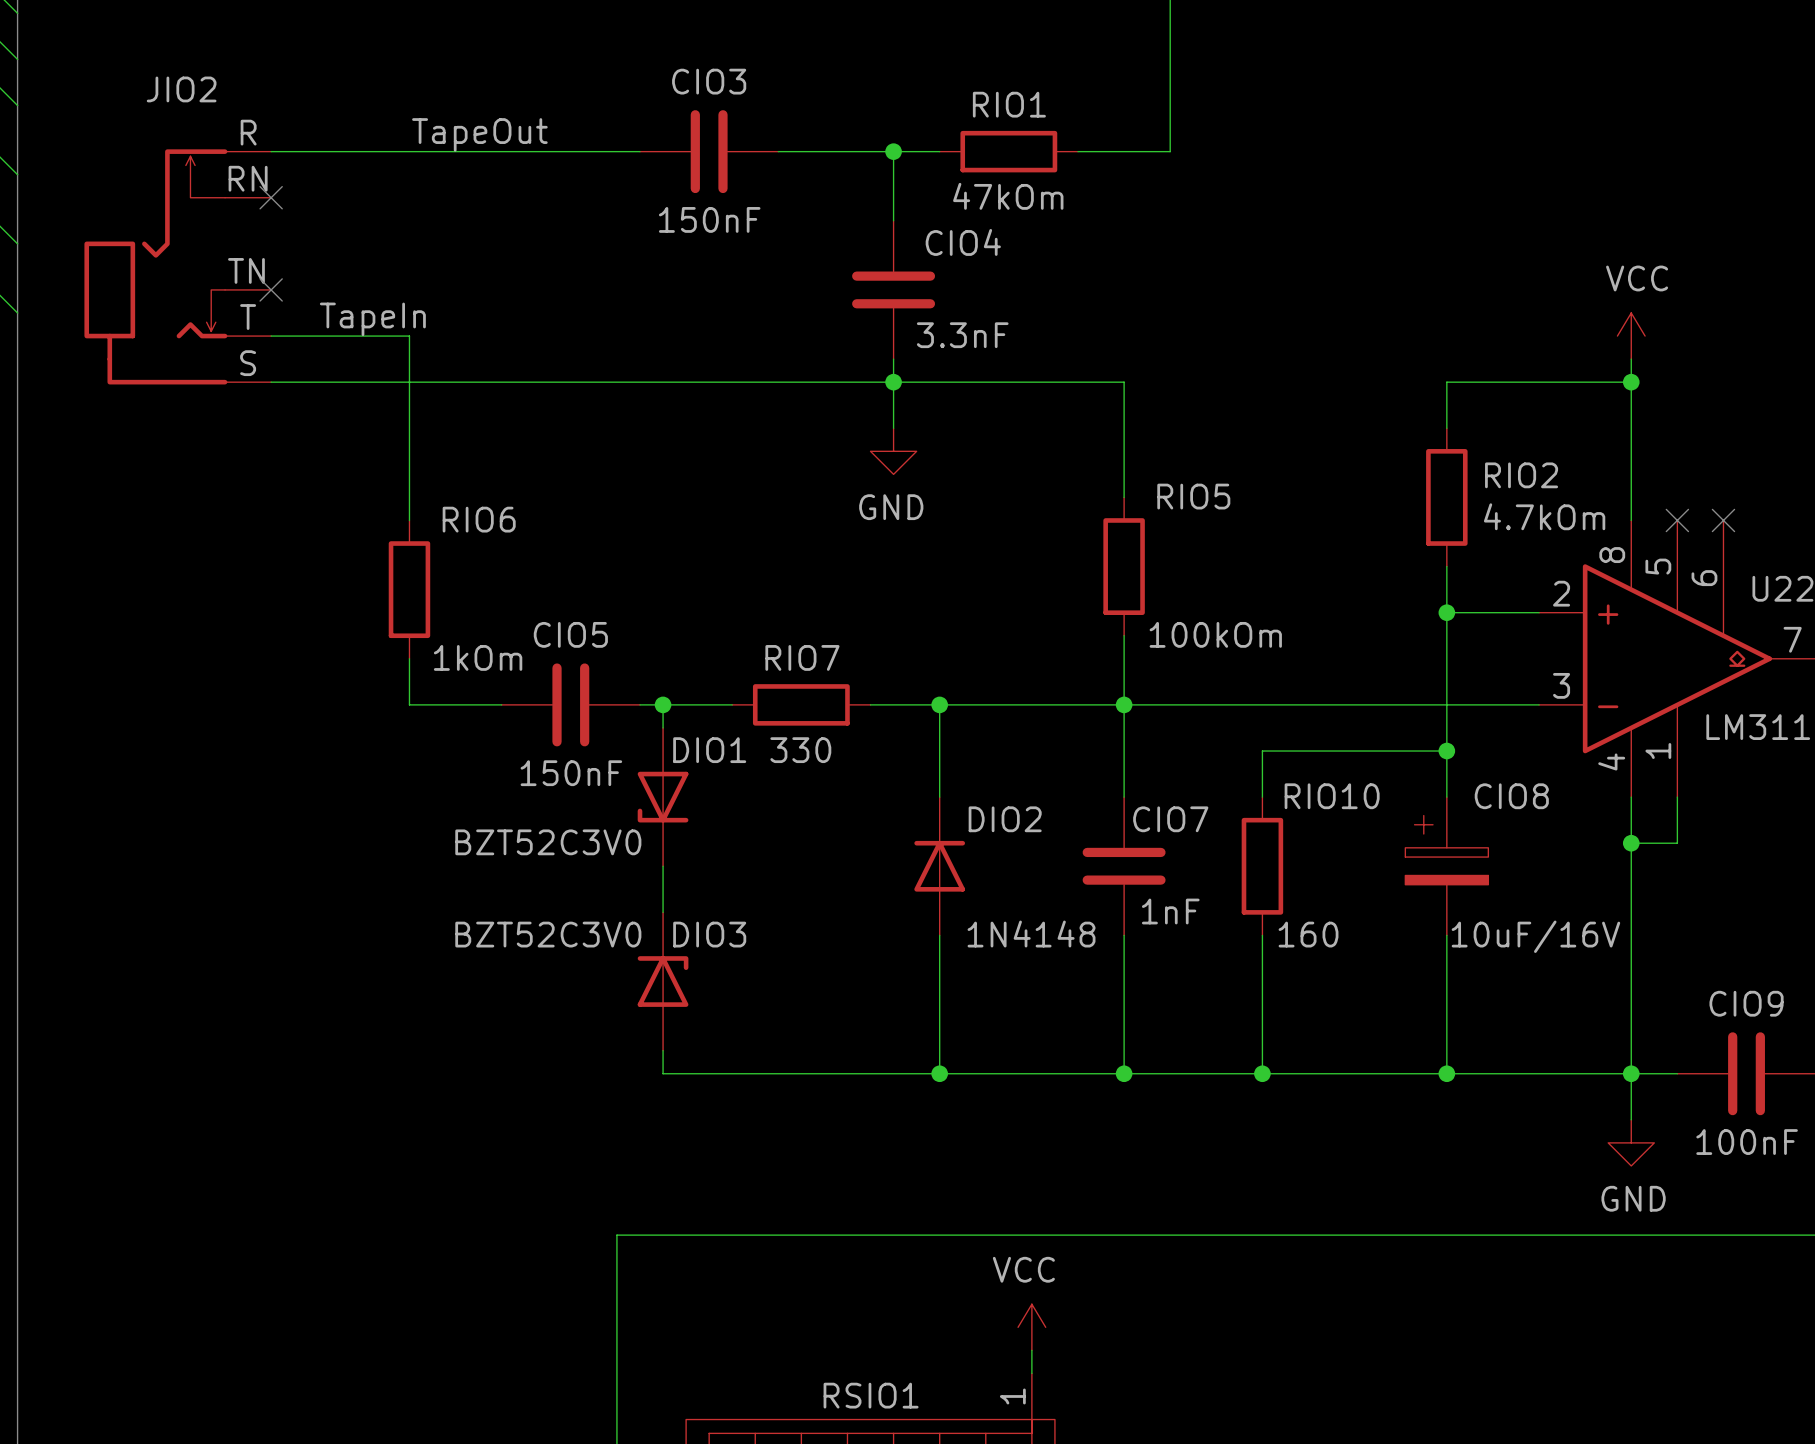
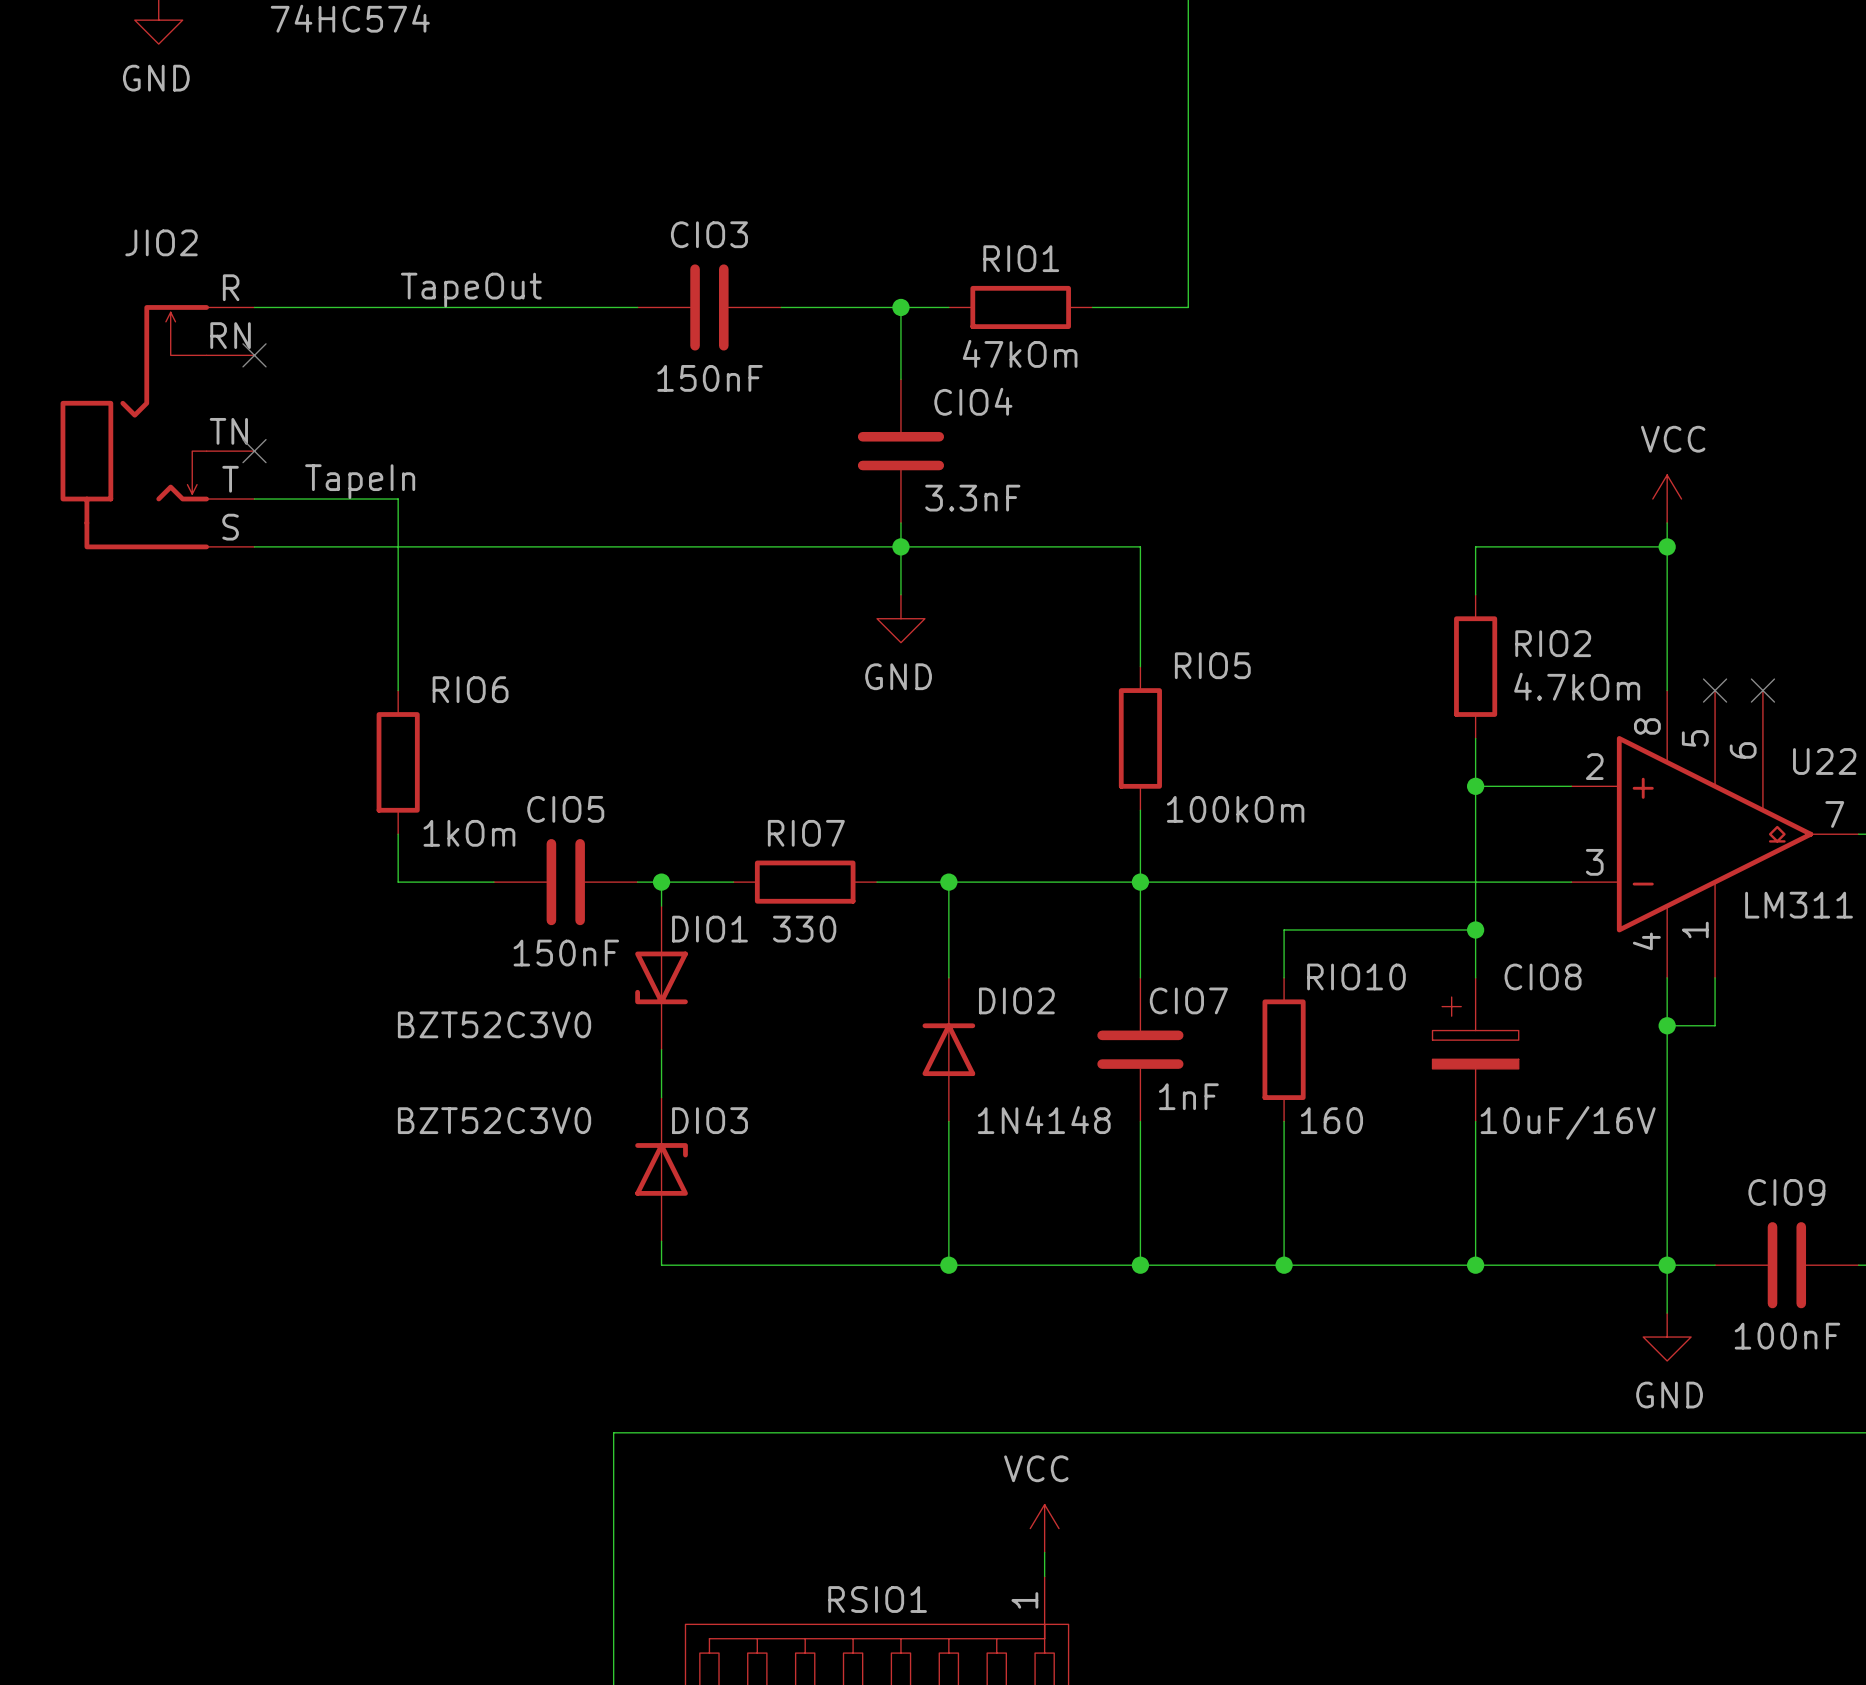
DIO1 value position: BZT52C3V0 (548, 842) -> BZT52C3V0 (494, 1024)
DIO3 value position: BZT52C3V0 (548, 934) -> BZT52C3V0 (494, 1120)

